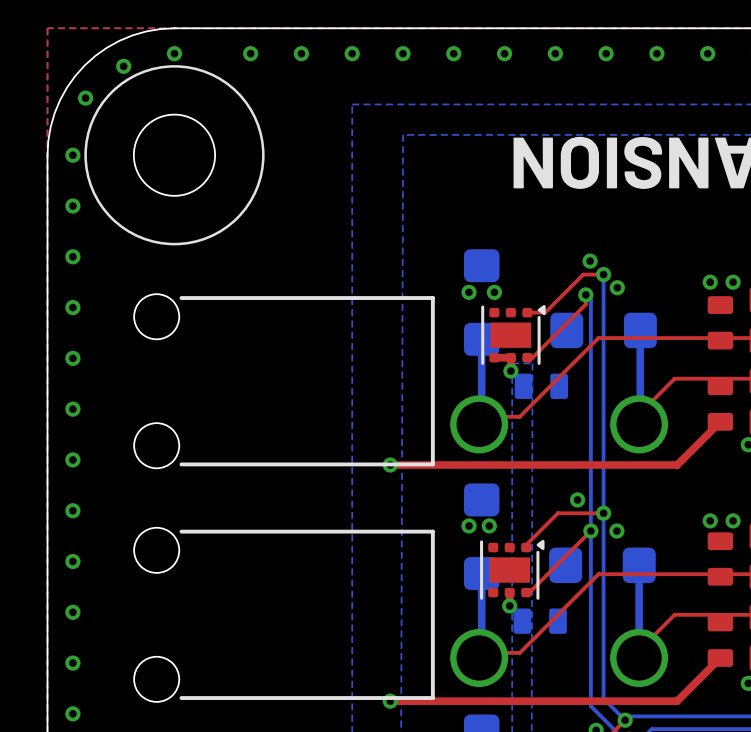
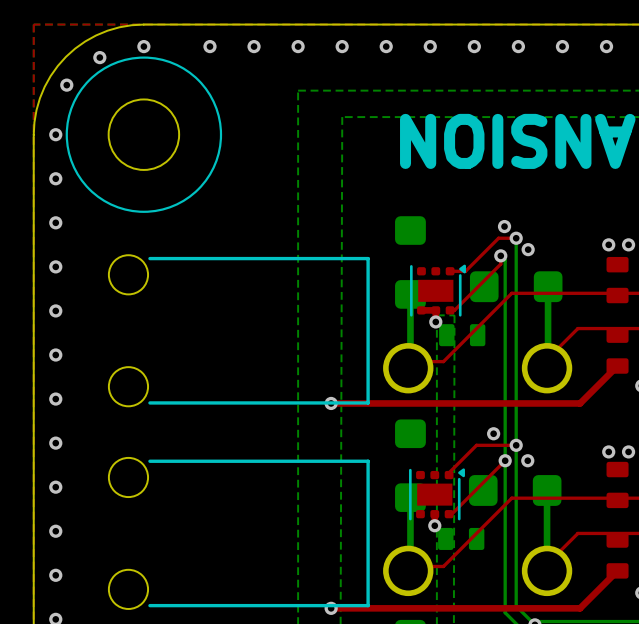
via: (469, 292) -> none
via: (494, 292) -> none
via: (469, 525) -> none
via: (489, 525) -> none

